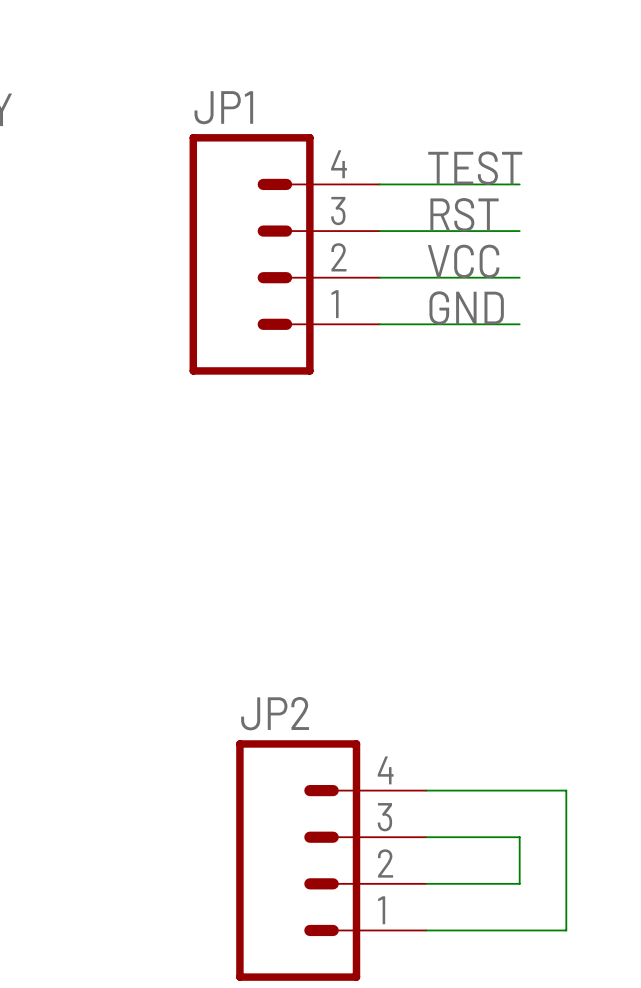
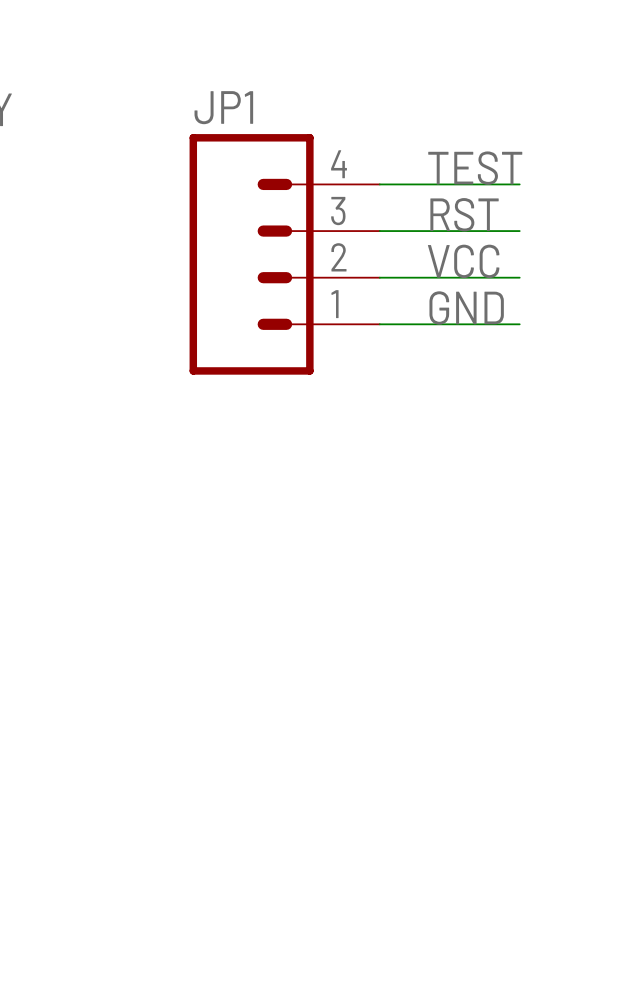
wire: (426, 790) (566, 790) (566, 930) (426, 930) -> none
wire: (426, 837) (519, 837) (519, 883) (426, 883) -> none
JP2: (331, 860) -> none

